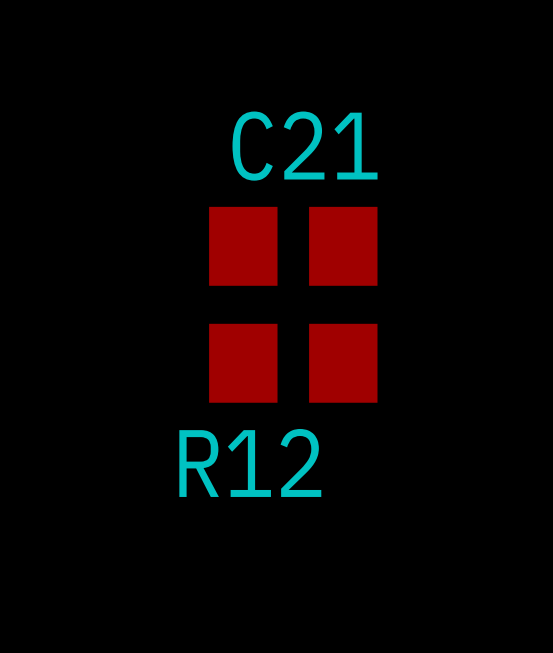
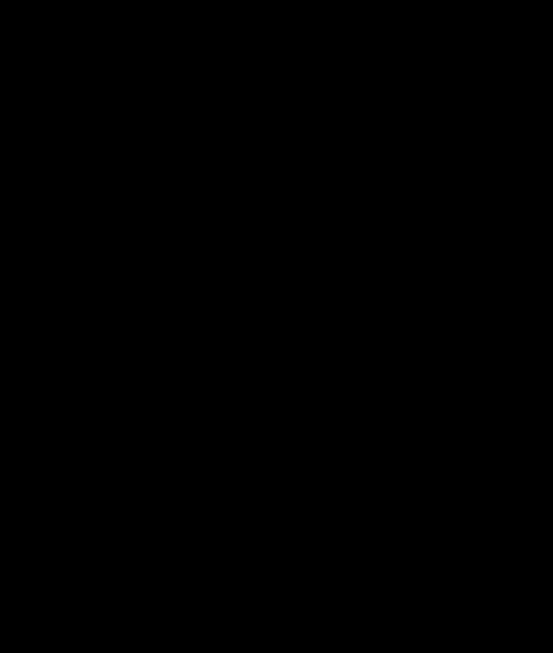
C21: (293, 246) -> none
R12: (293, 363) -> none

